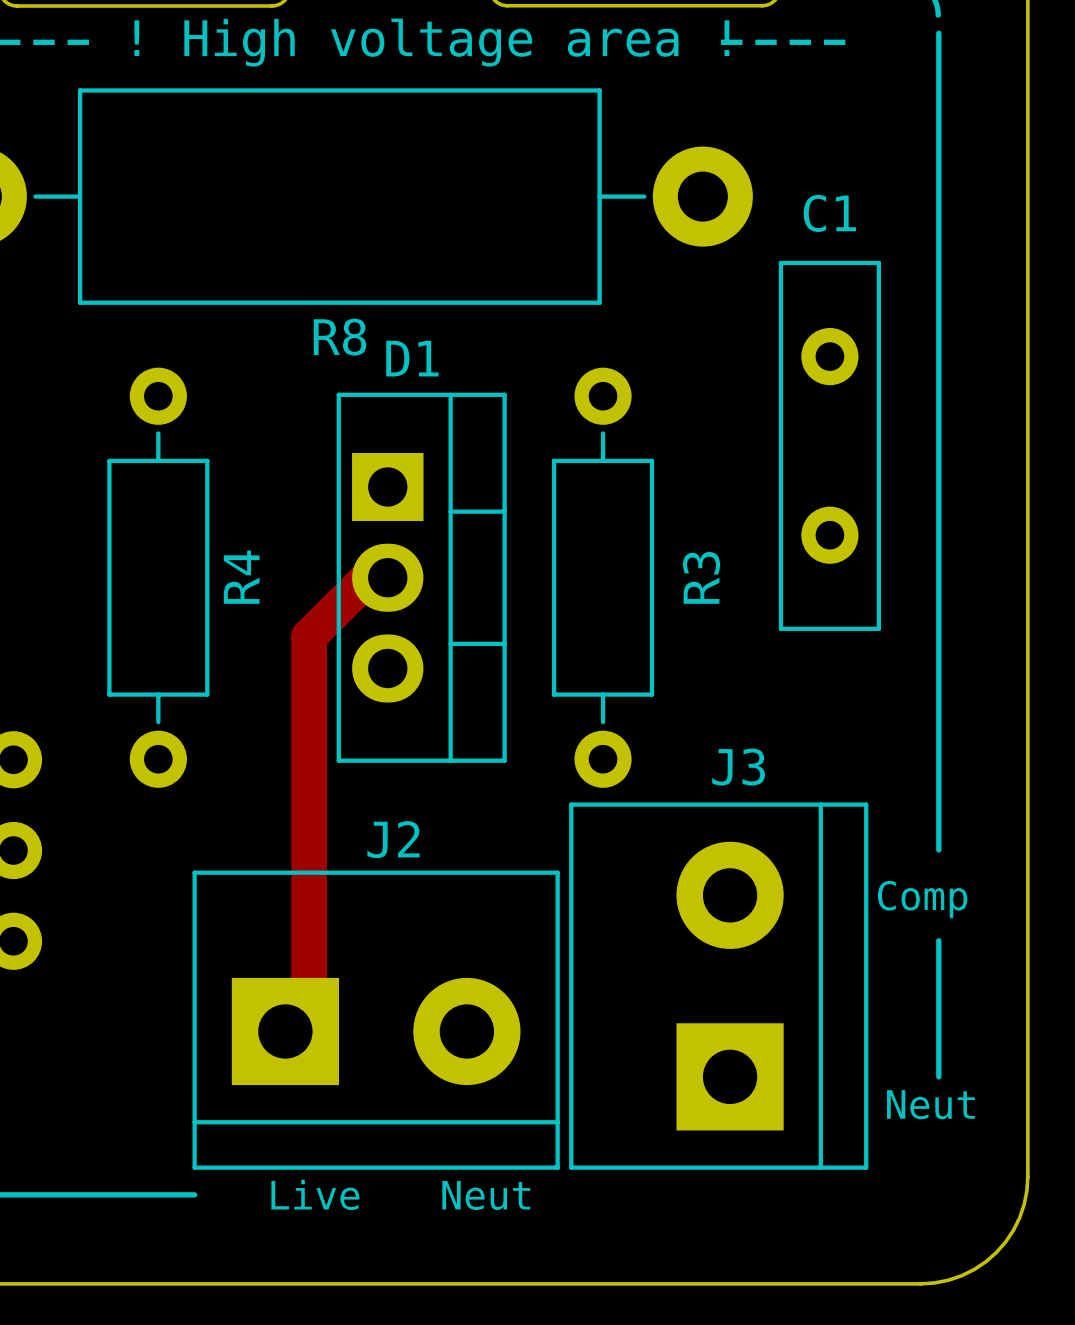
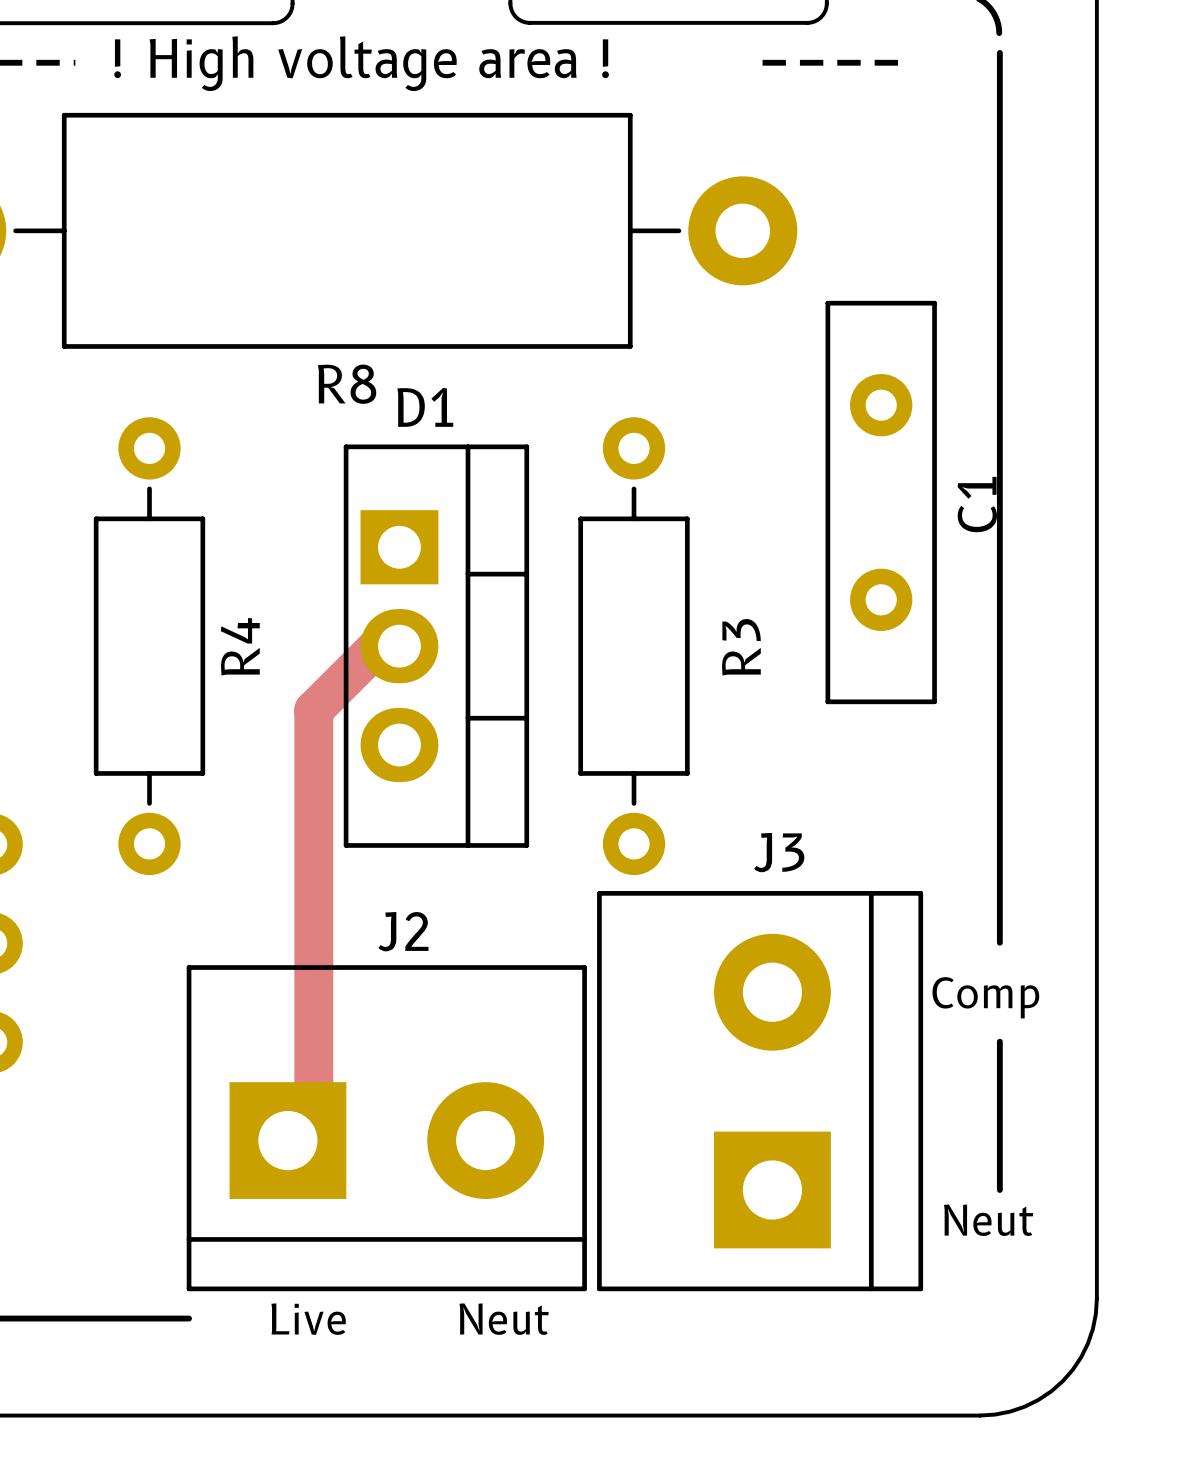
C1 name rotation: 0° (829, 213) -> 90° counterclockwise (977, 504)
C1 name position: C1 (829, 213) -> C1 (977, 504)

